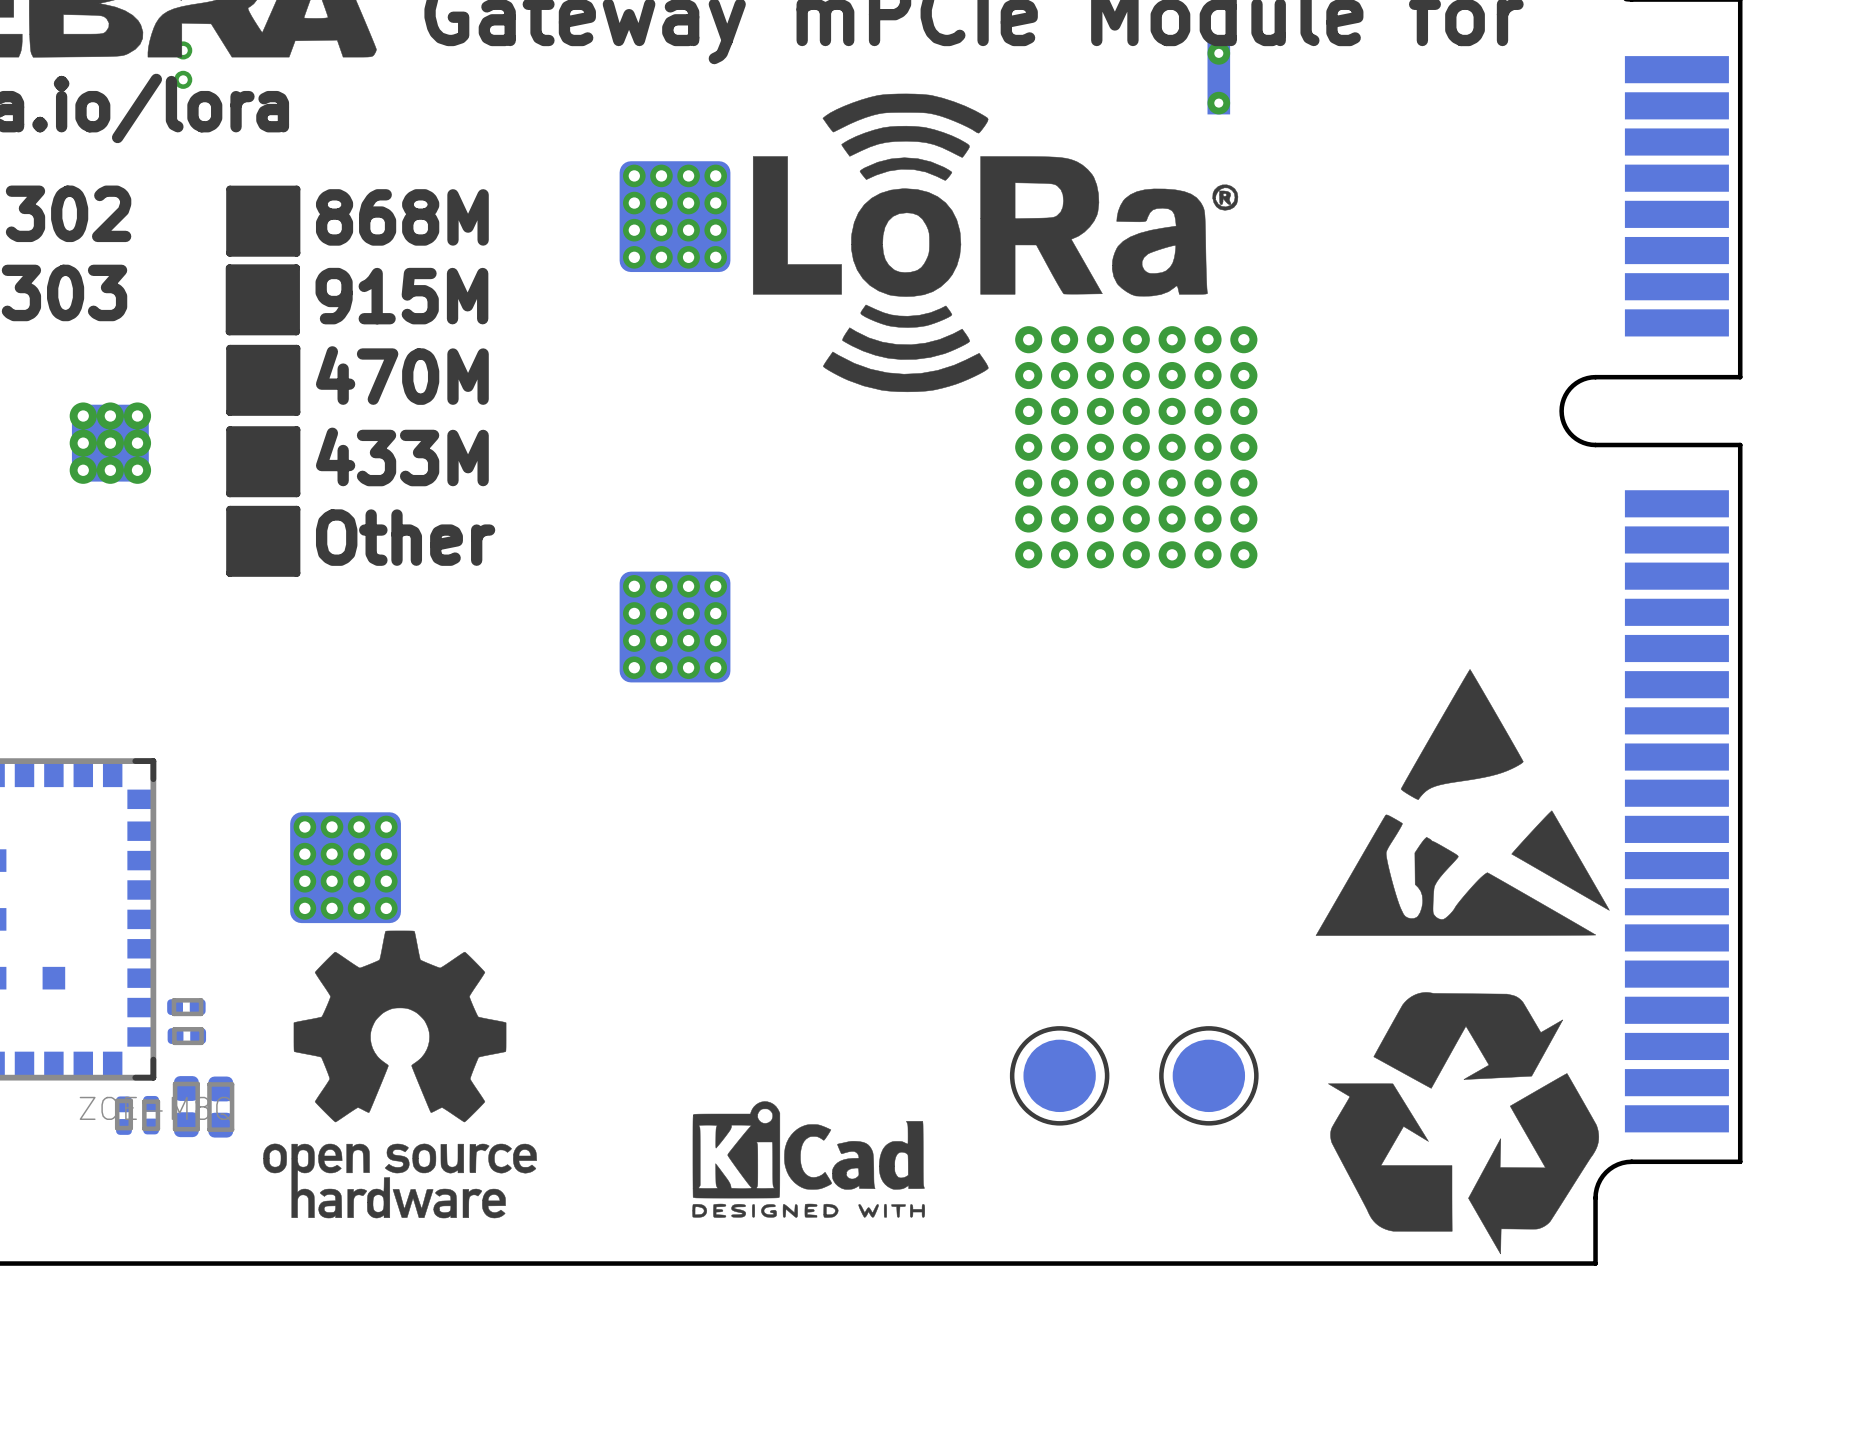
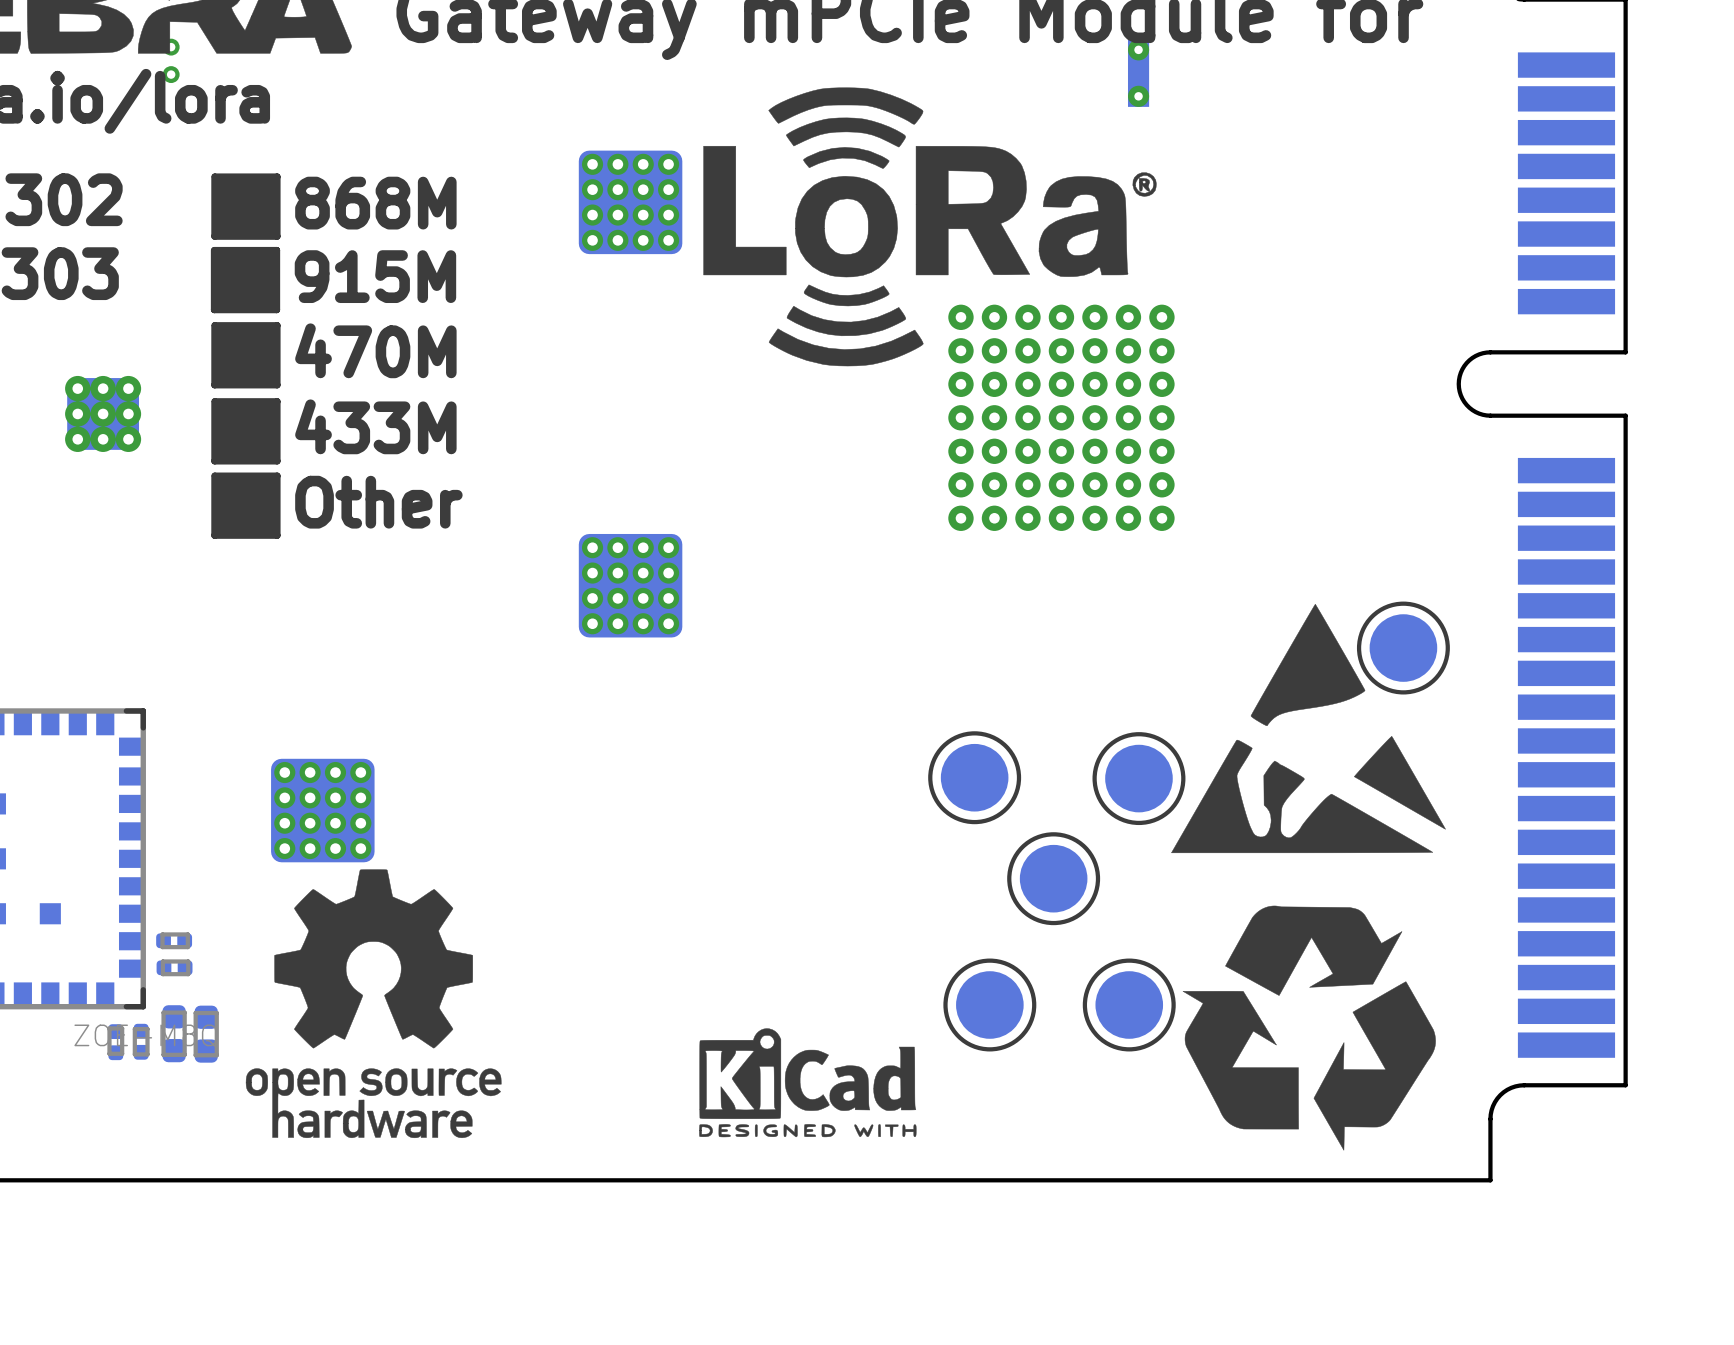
part: none -> (1403, 648)
drawing position: (1462, 802) -> (1308, 728)
part: none -> (974, 777)
part: none -> (1138, 778)
part: none -> (1053, 878)
drawing position: (1463, 1123) -> (1309, 1028)
drawing position: (808, 1159) -> (807, 1082)

